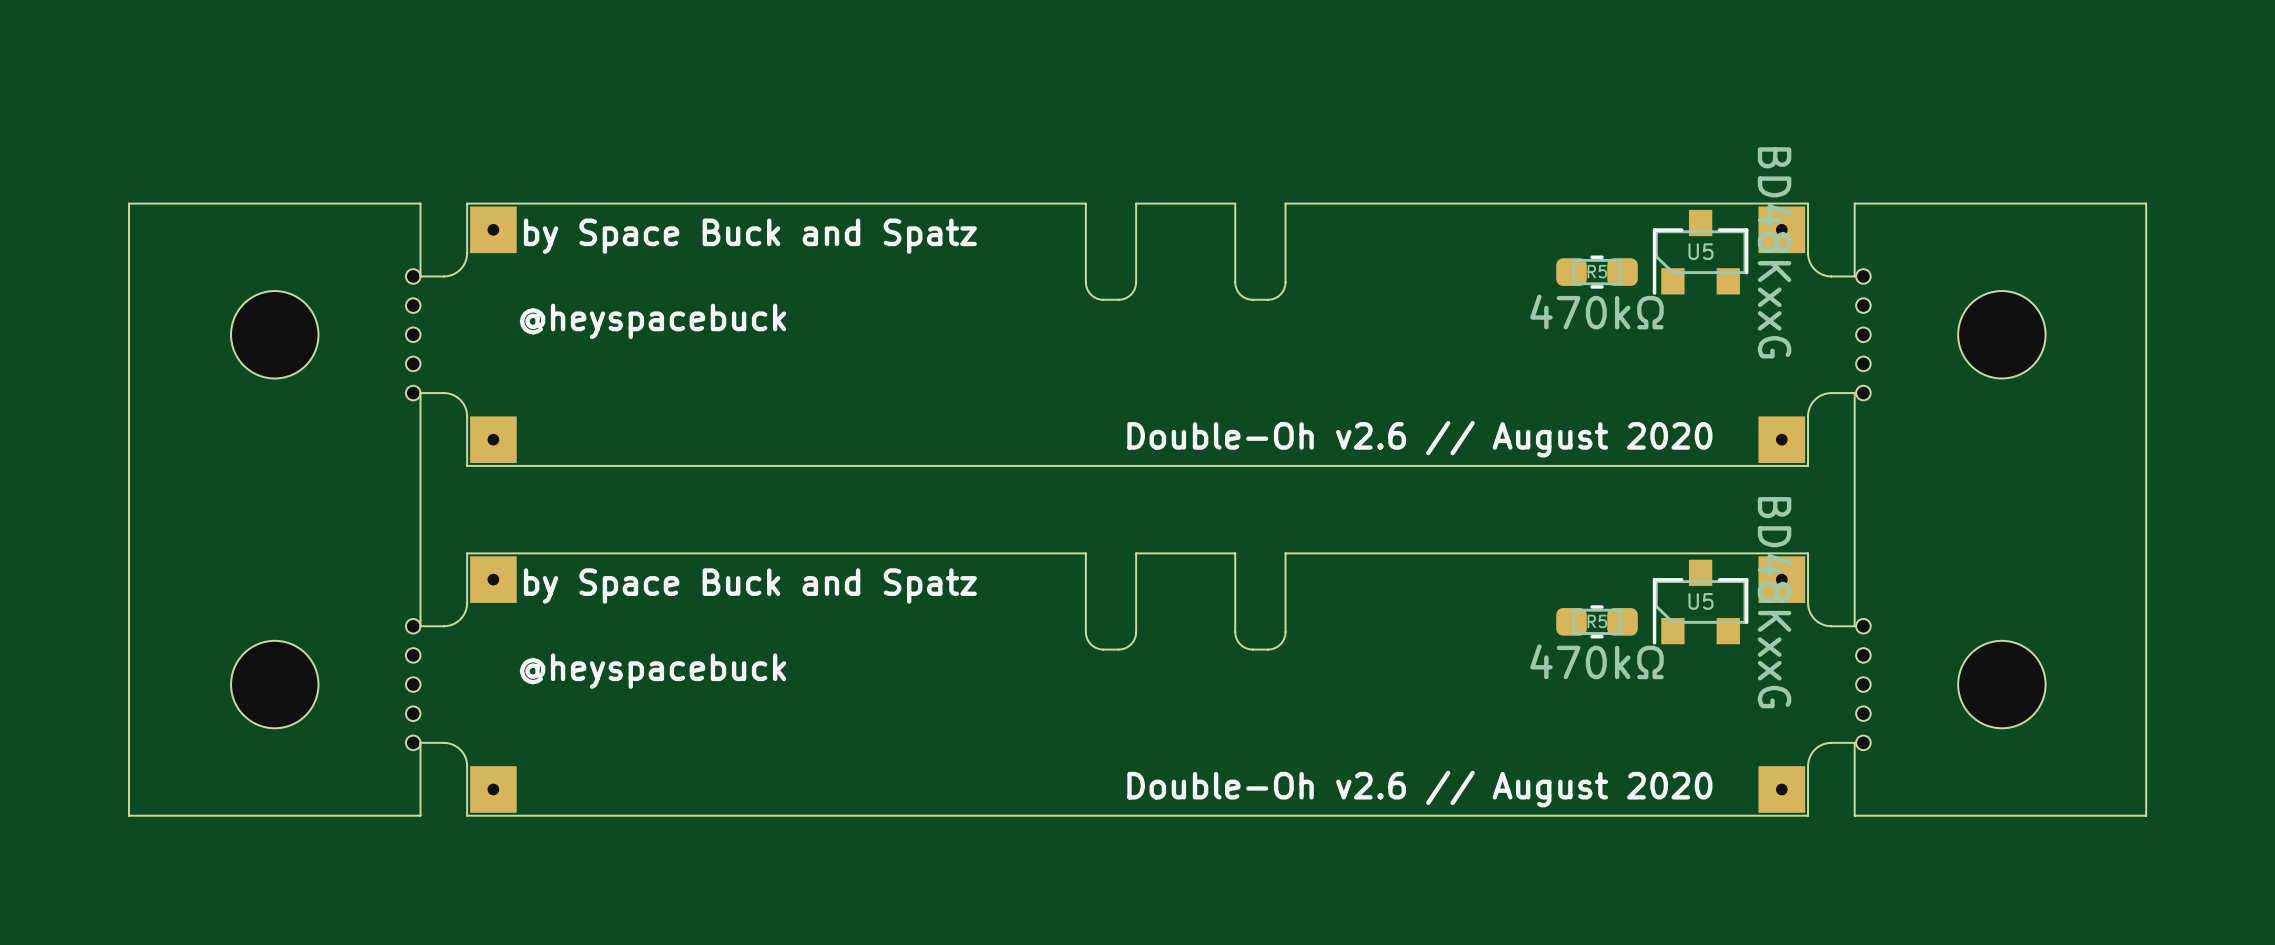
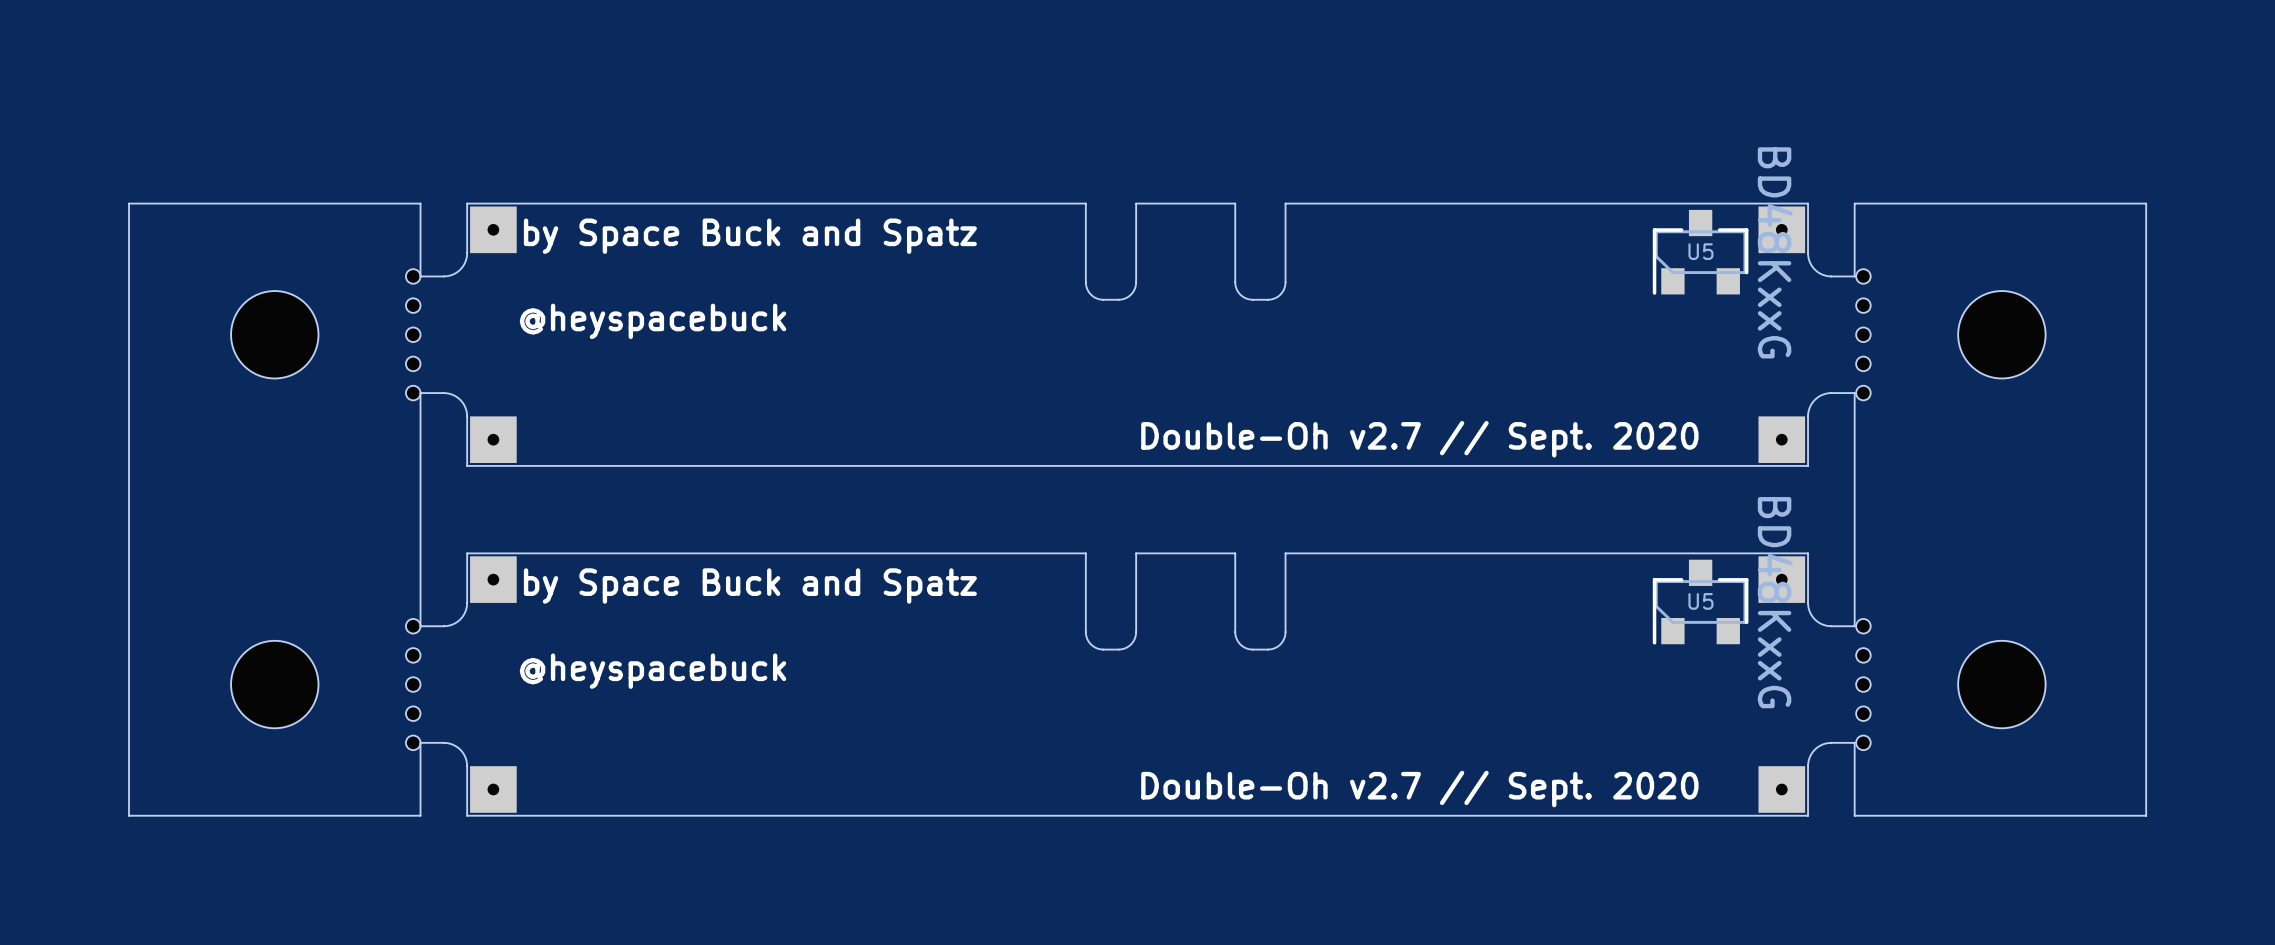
R5: 470kΩ (1597, 272) -> none
text: Double-Oh v2.6 // August 2020 (1419, 439) -> Double-Oh v2.7 // Sept. 2020 (1419, 439)
R5: 470kΩ (1597, 621) -> none
text: Double-Oh v2.6 // August 2020 (1419, 789) -> Double-Oh v2.7 // Sept. 2020 (1419, 789)

